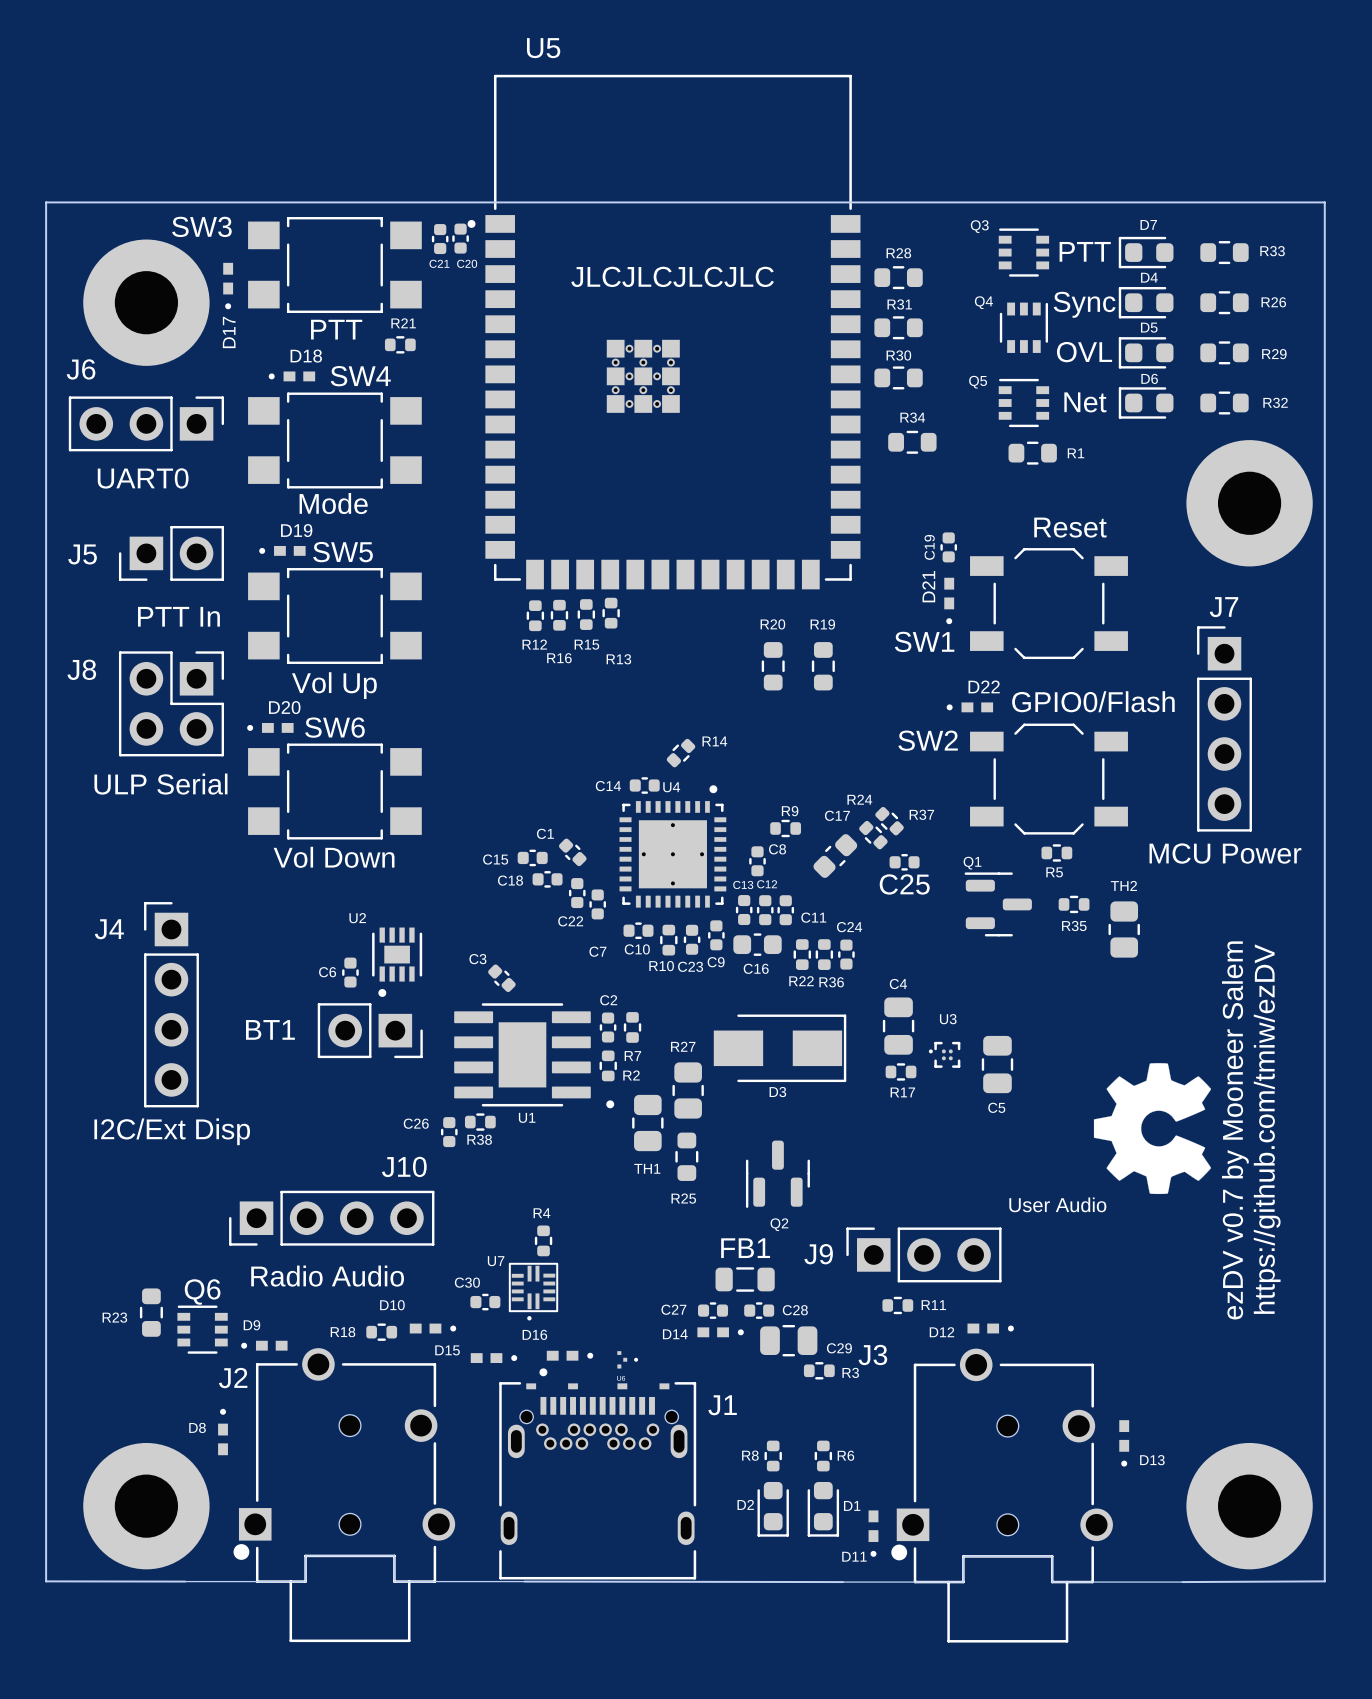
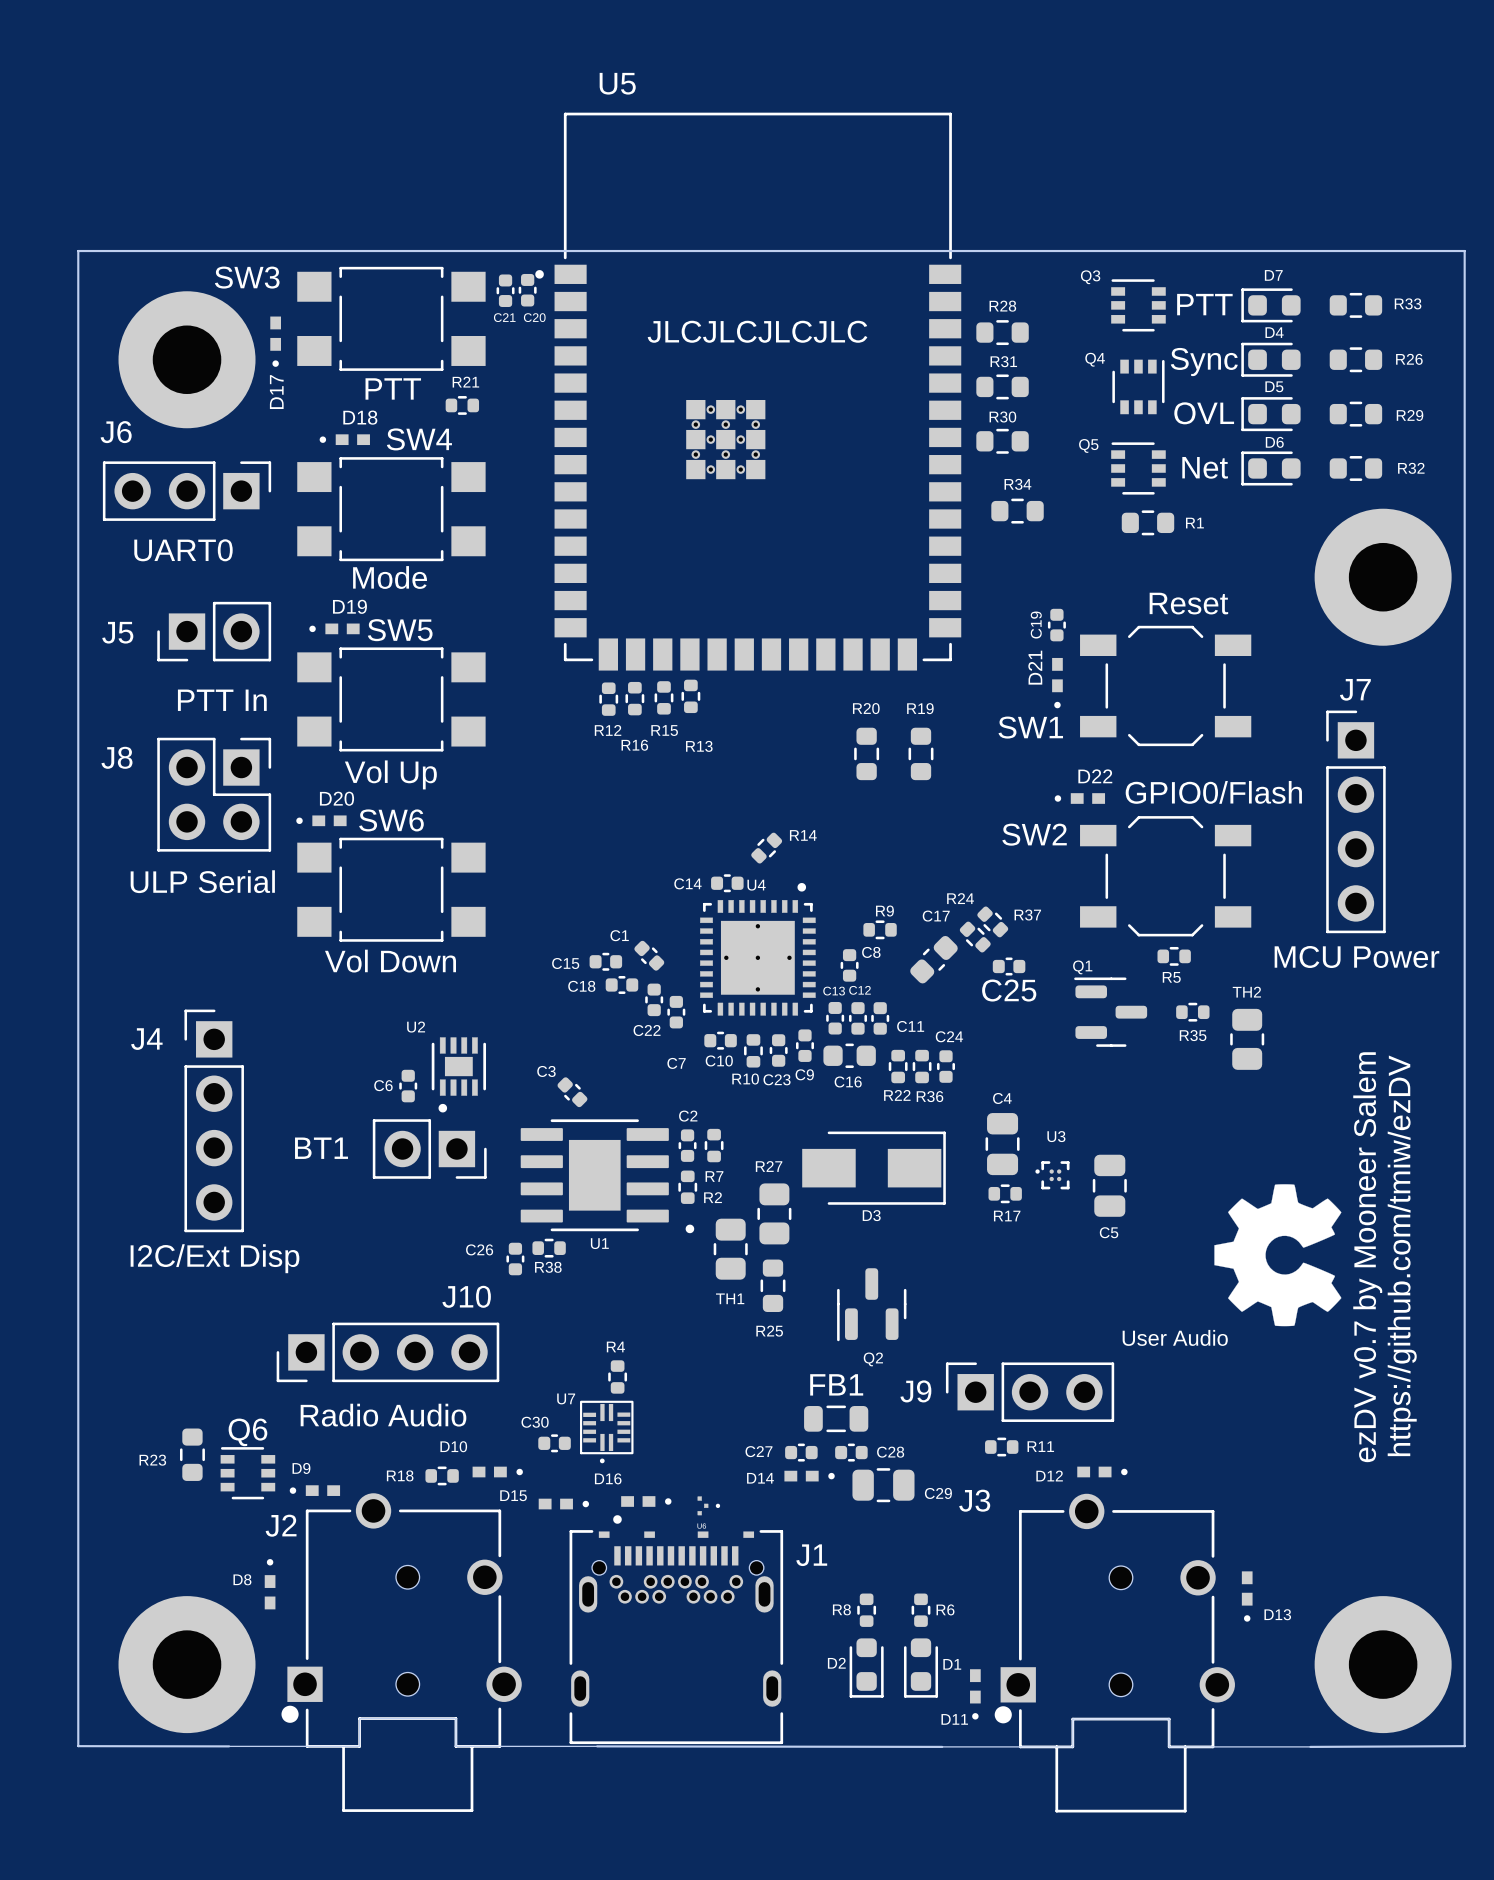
R3: (819, 1370) -> none

